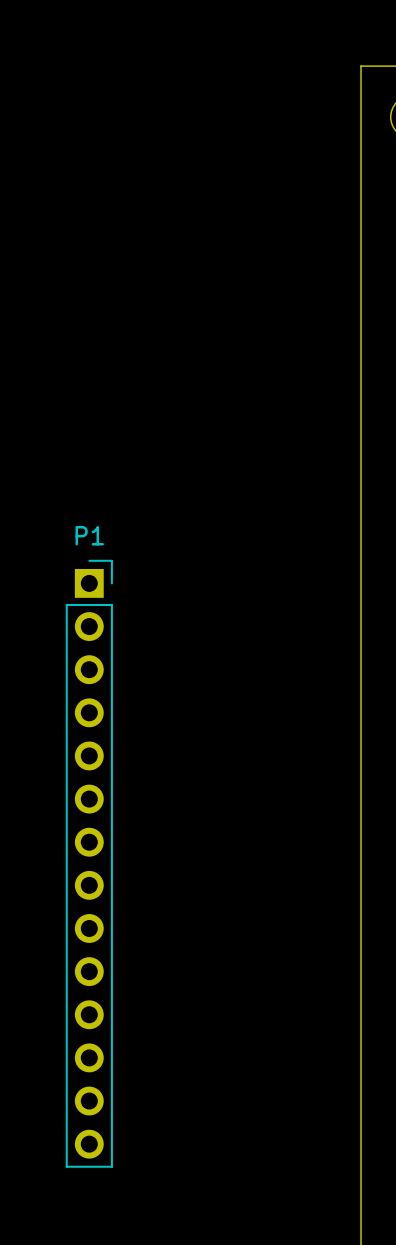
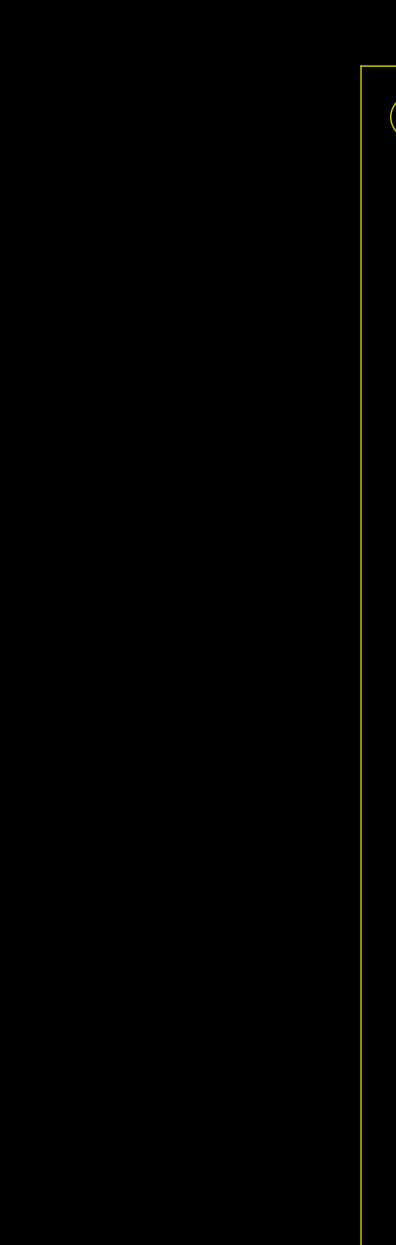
P1: (89, 863) -> none

